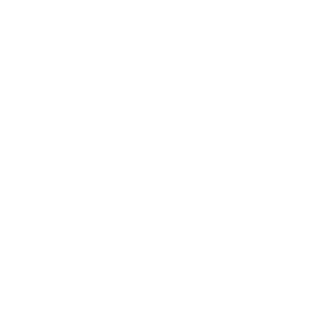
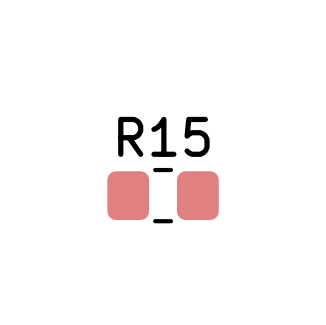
R15: none -> (163, 195)

